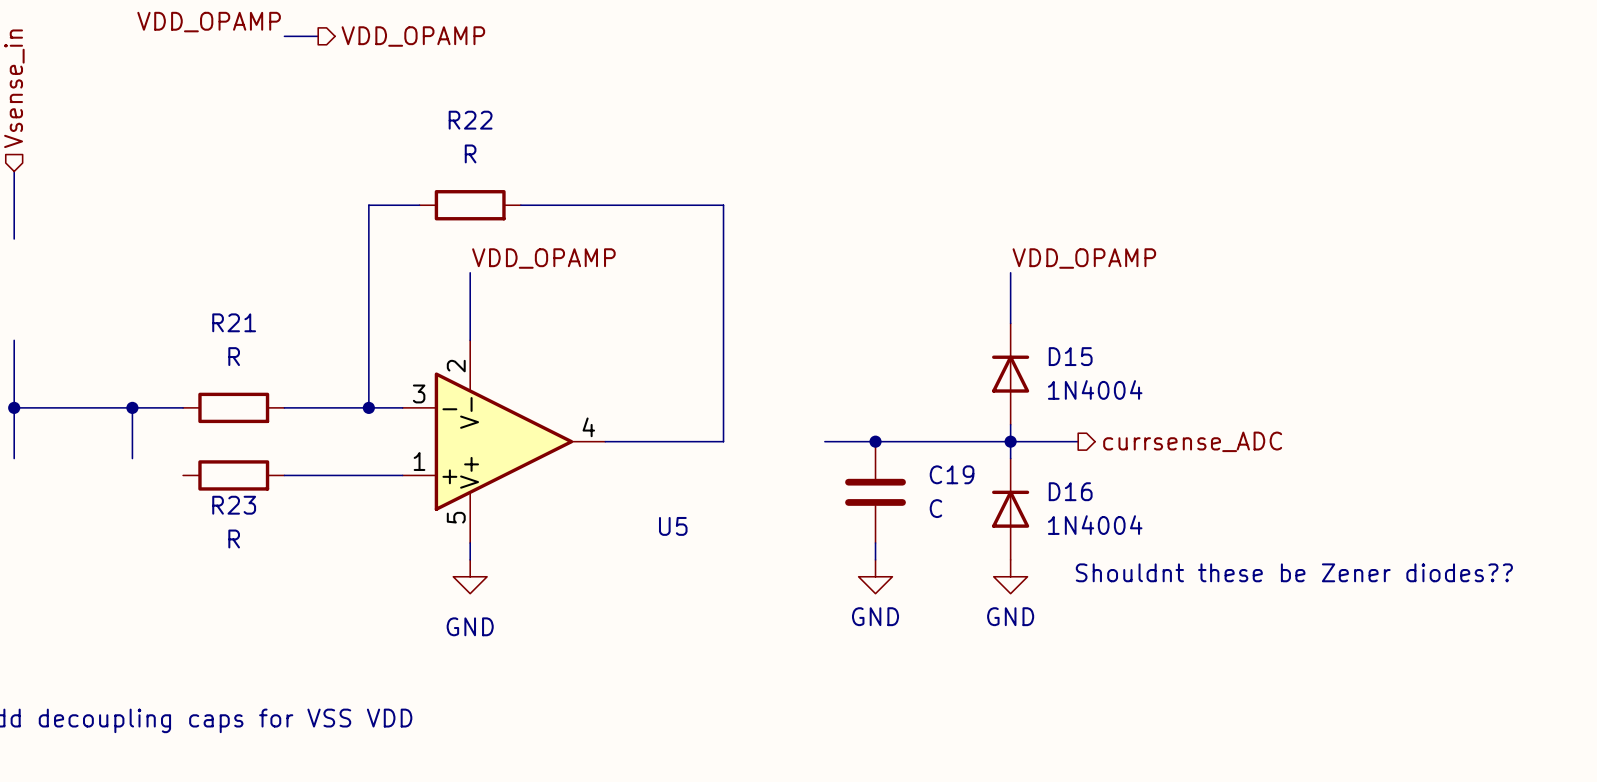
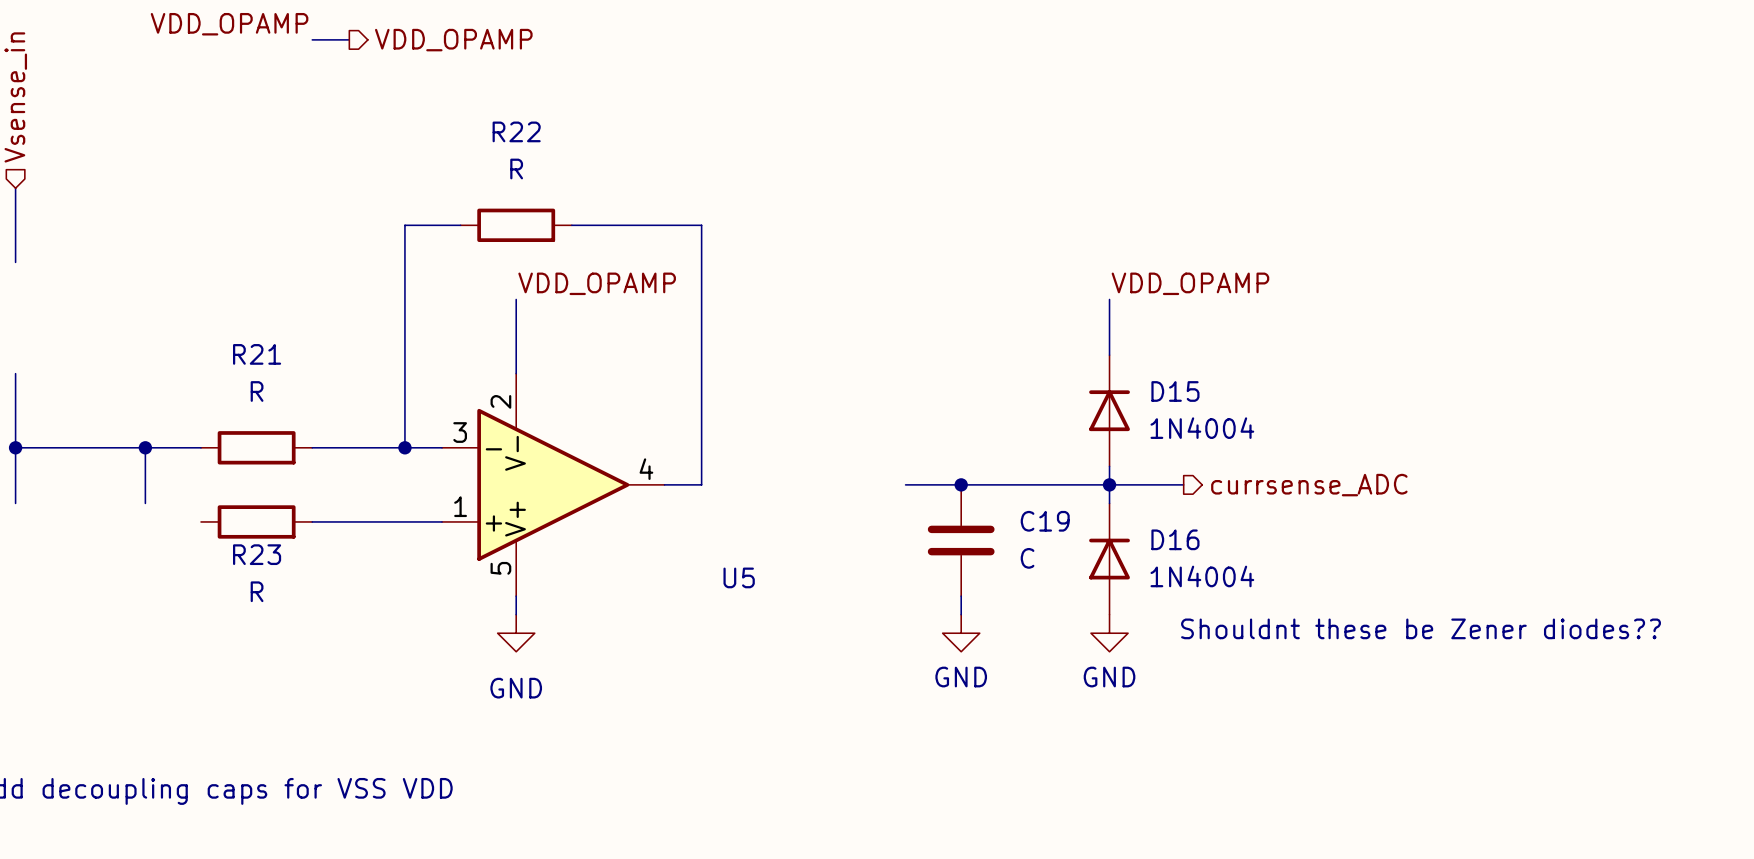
wire: (639, 205) (723, 205) (723, 441) (639, 441) -> (701, 225) (701, 484)

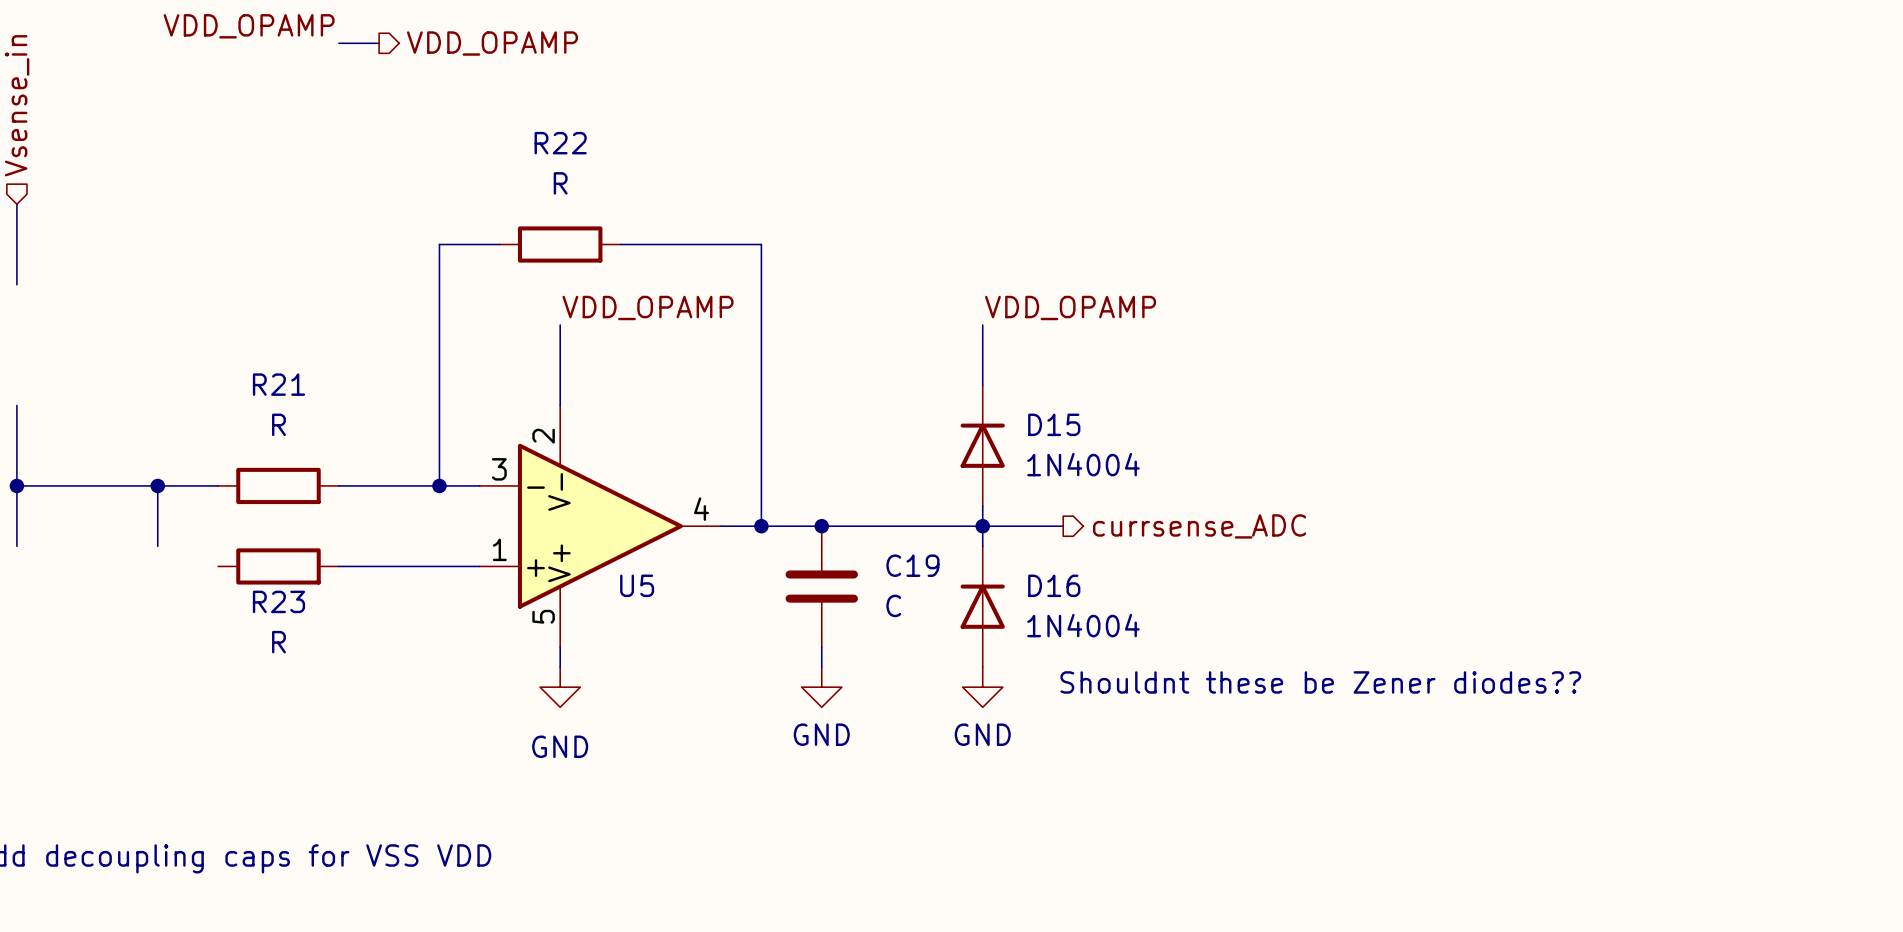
label position: VDD_OPAMP (1190, 283) -> VDD_OPAMP (1070, 307)
wire: (1109, 299) (1109, 355) -> (982, 324) (982, 385)
D15 position: (1109, 410) -> (982, 445)
wire: (1109, 466) (1109, 503) -> (982, 506) (982, 546)
junction: none -> (761, 526)
junction: none -> (821, 526)
junction position: (961, 484) -> (982, 526)
wire: (979, 484) (1183, 484) -> (761, 526) (982, 526)
junction: (1109, 484) -> none
hierarchical label position: currsense_ADC (1309, 485) -> currsense_ADC (1199, 526)
C19 position: (961, 540) -> (821, 586)
D16 position: (1109, 559) -> (982, 606)
U5 name position: U5 (739, 577) -> U5 (637, 585)
wire: (961, 596) (961, 614) -> (821, 646) (821, 667)
text position: Shouldnt these be Zener diodes?? (1421, 628) -> Shouldnt these be Zener diodes?? (1320, 682)
power symbol: none -> GND (821, 687)
power symbol position: GND (961, 633) -> GND (982, 687)
power symbol: GND (1109, 633) -> none

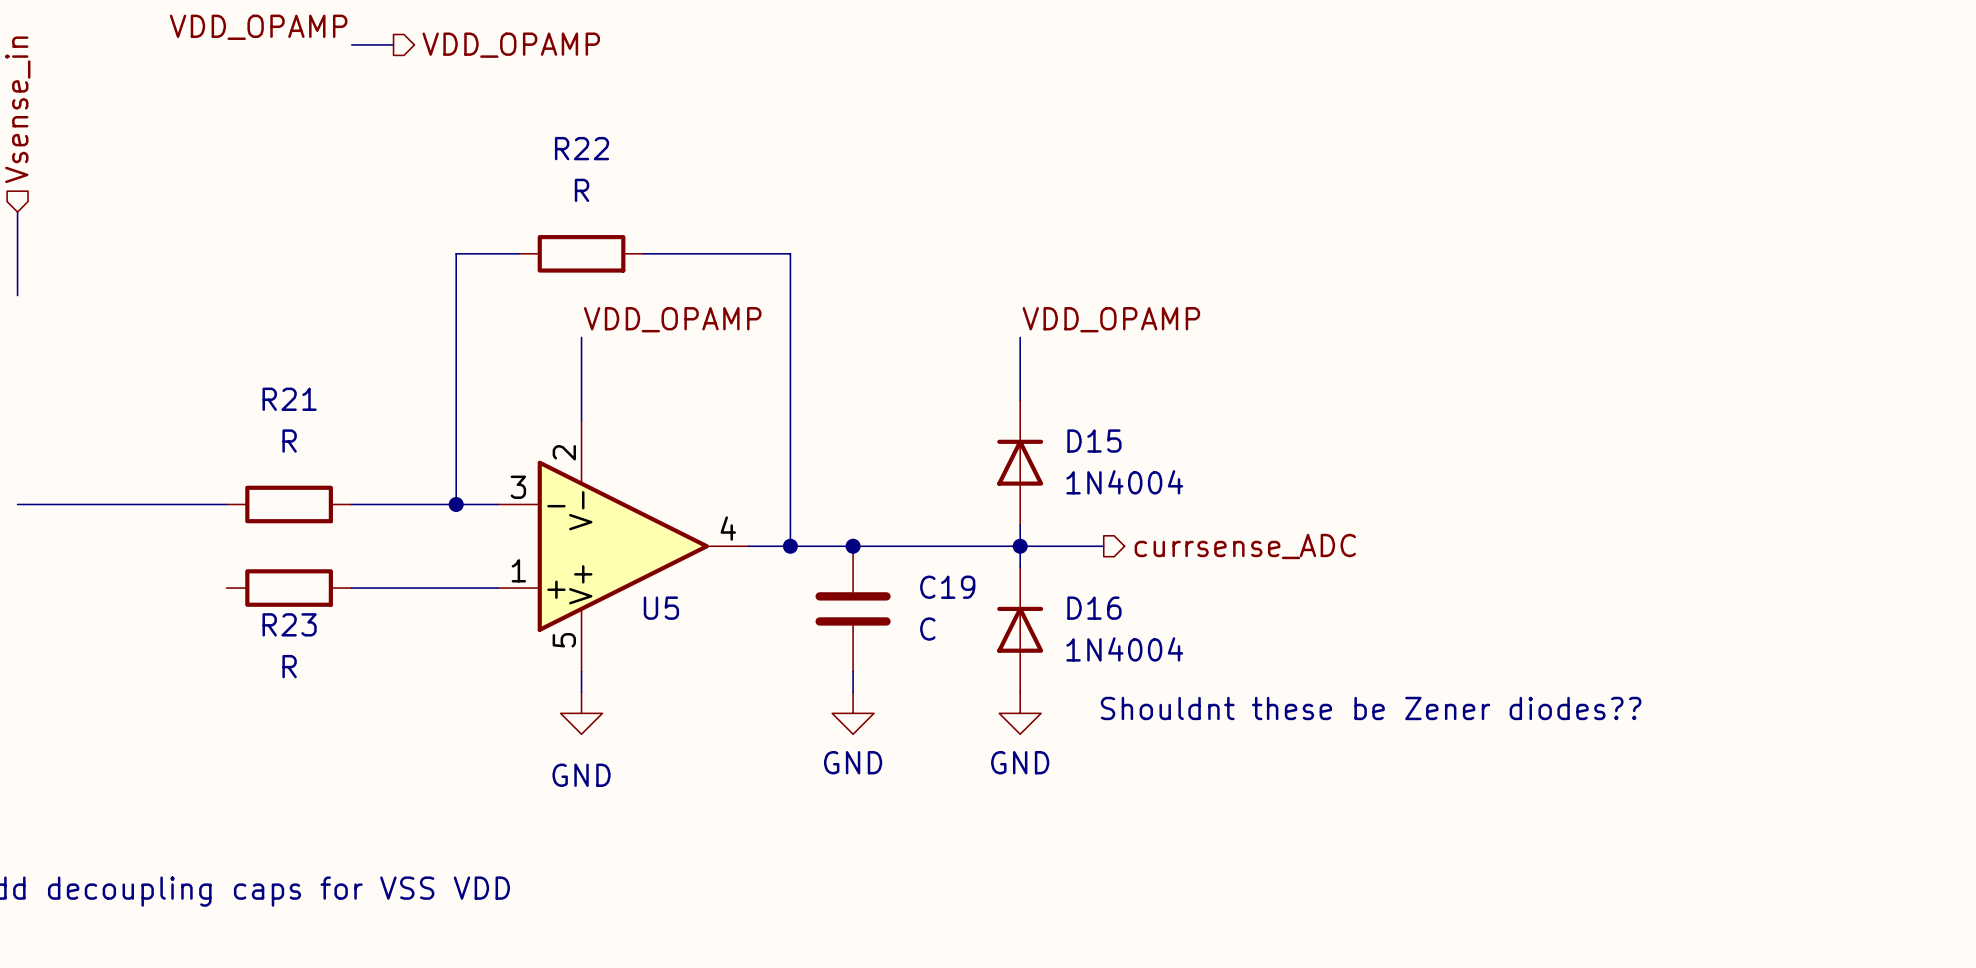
wire: (16, 405) (16, 546) -> none
junction: (16, 485) -> none
wire: (157, 485) (157, 546) -> none
junction: (157, 485) -> none

